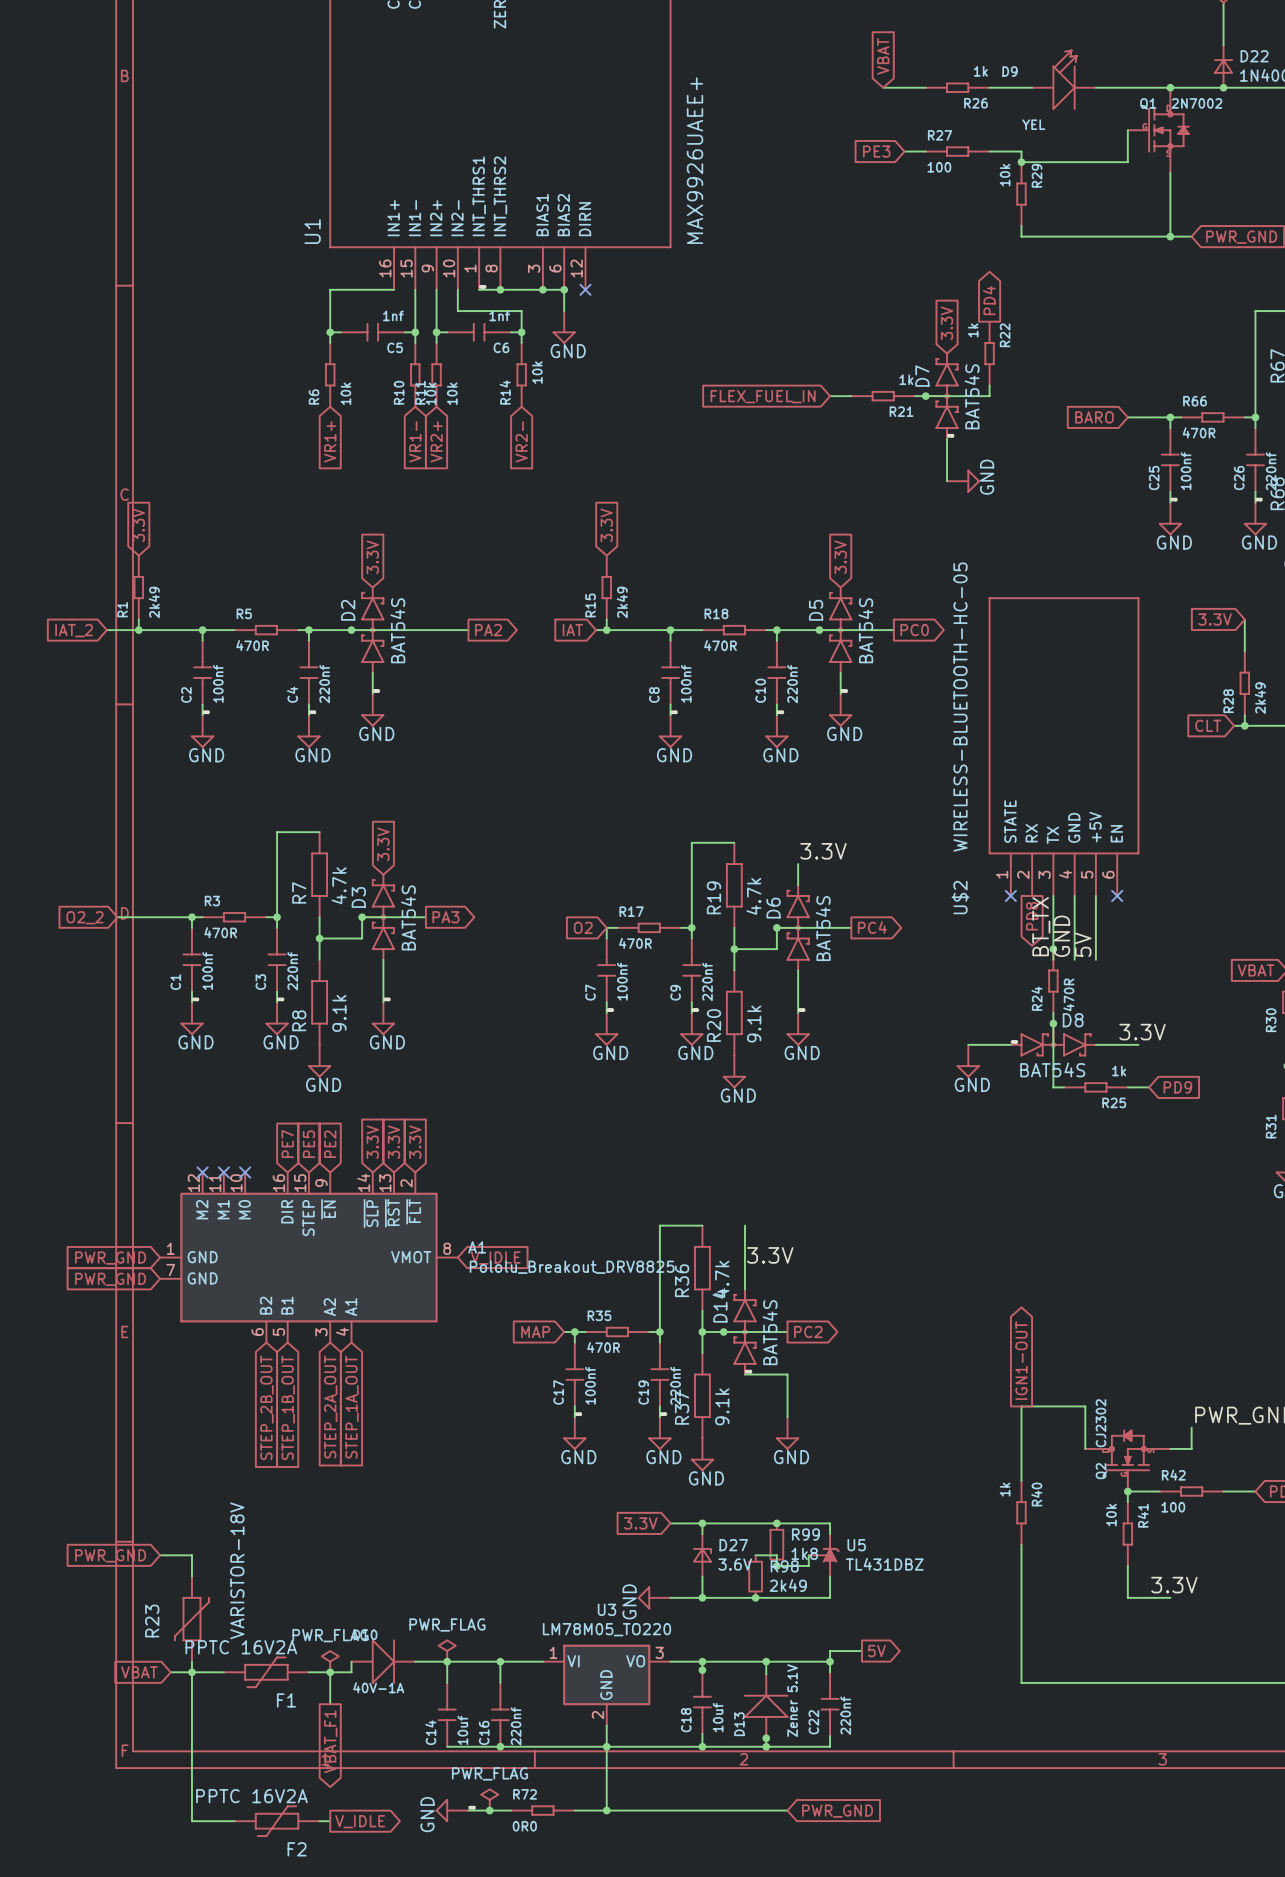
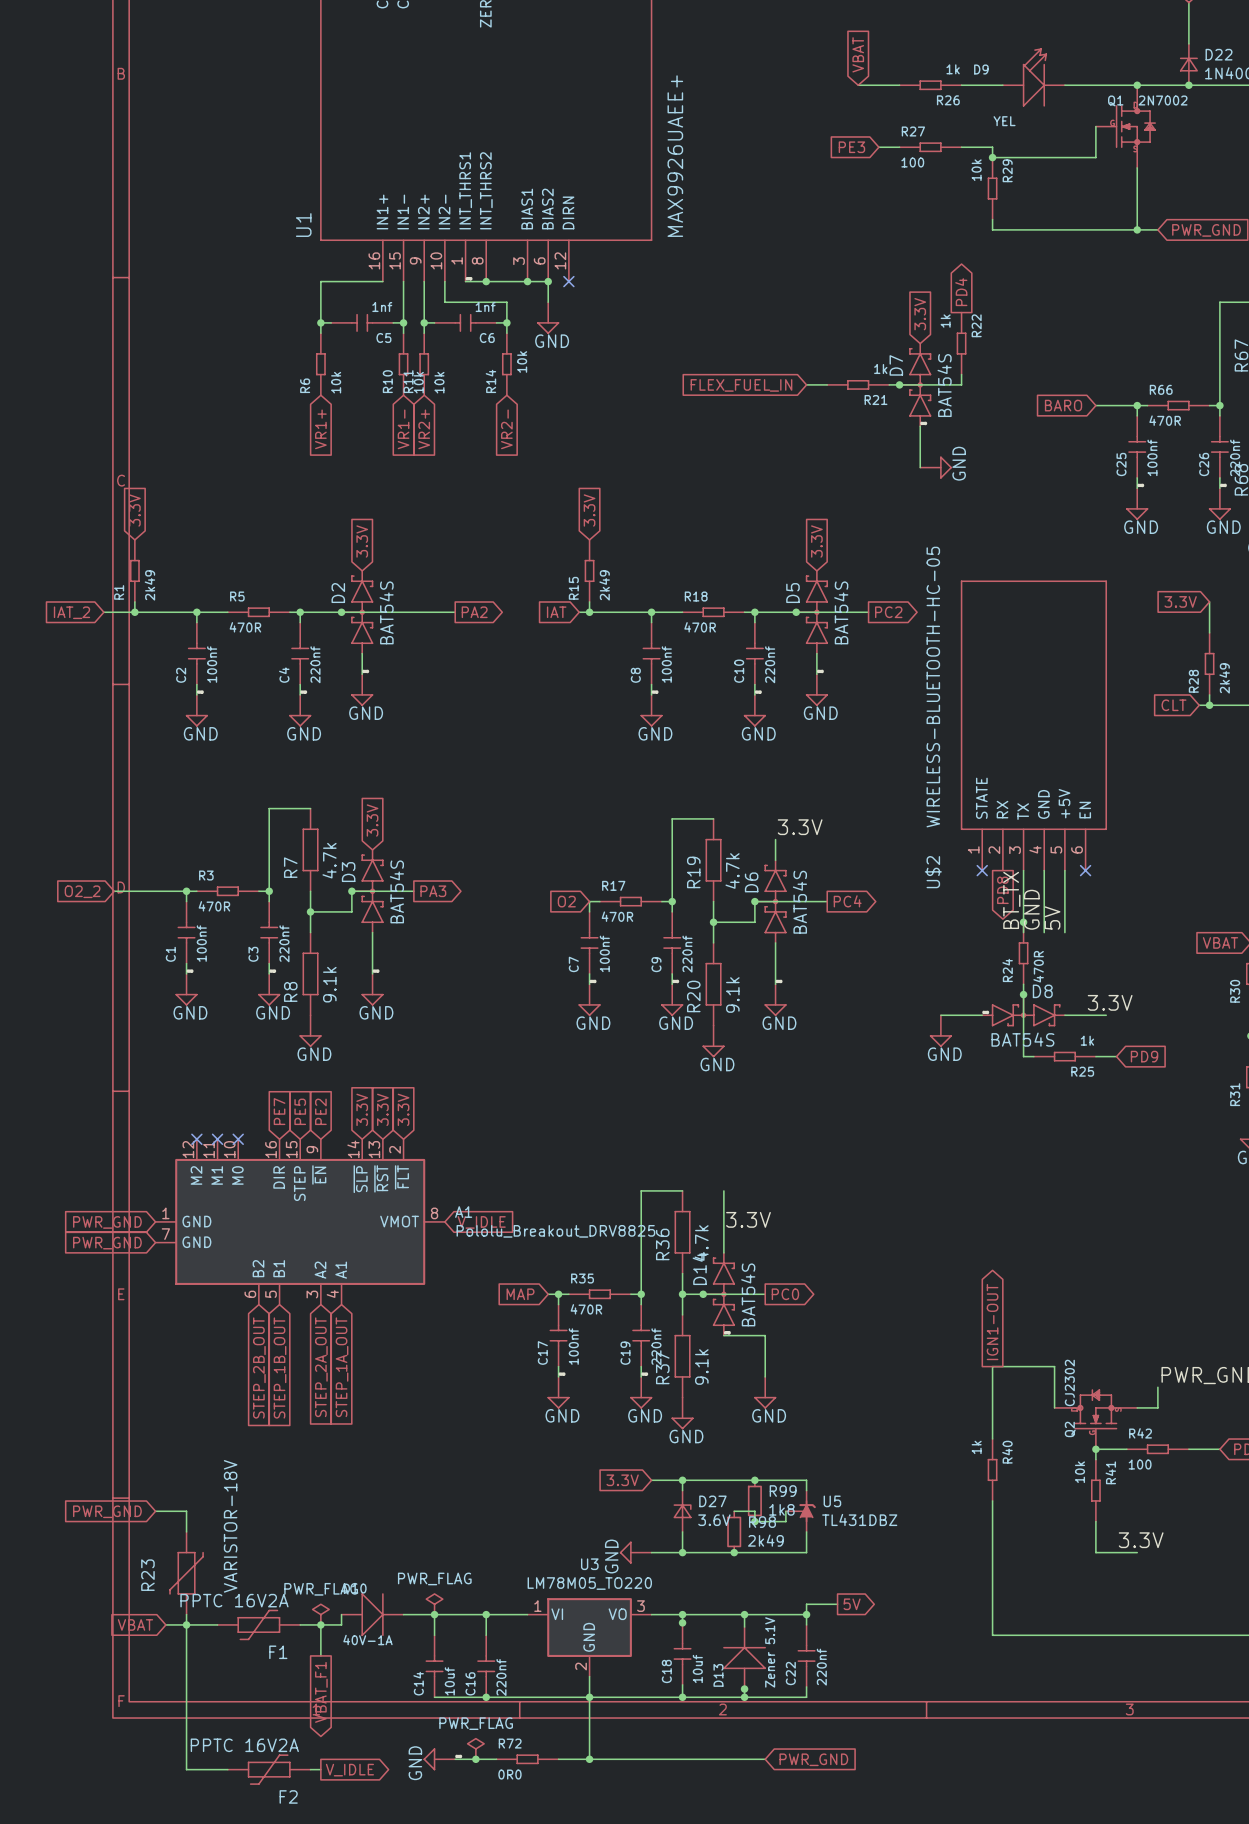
global label: PC0 (914, 630) -> PC2 (888, 612)
global label: PC2 (808, 1331) -> PC0 (785, 1294)

